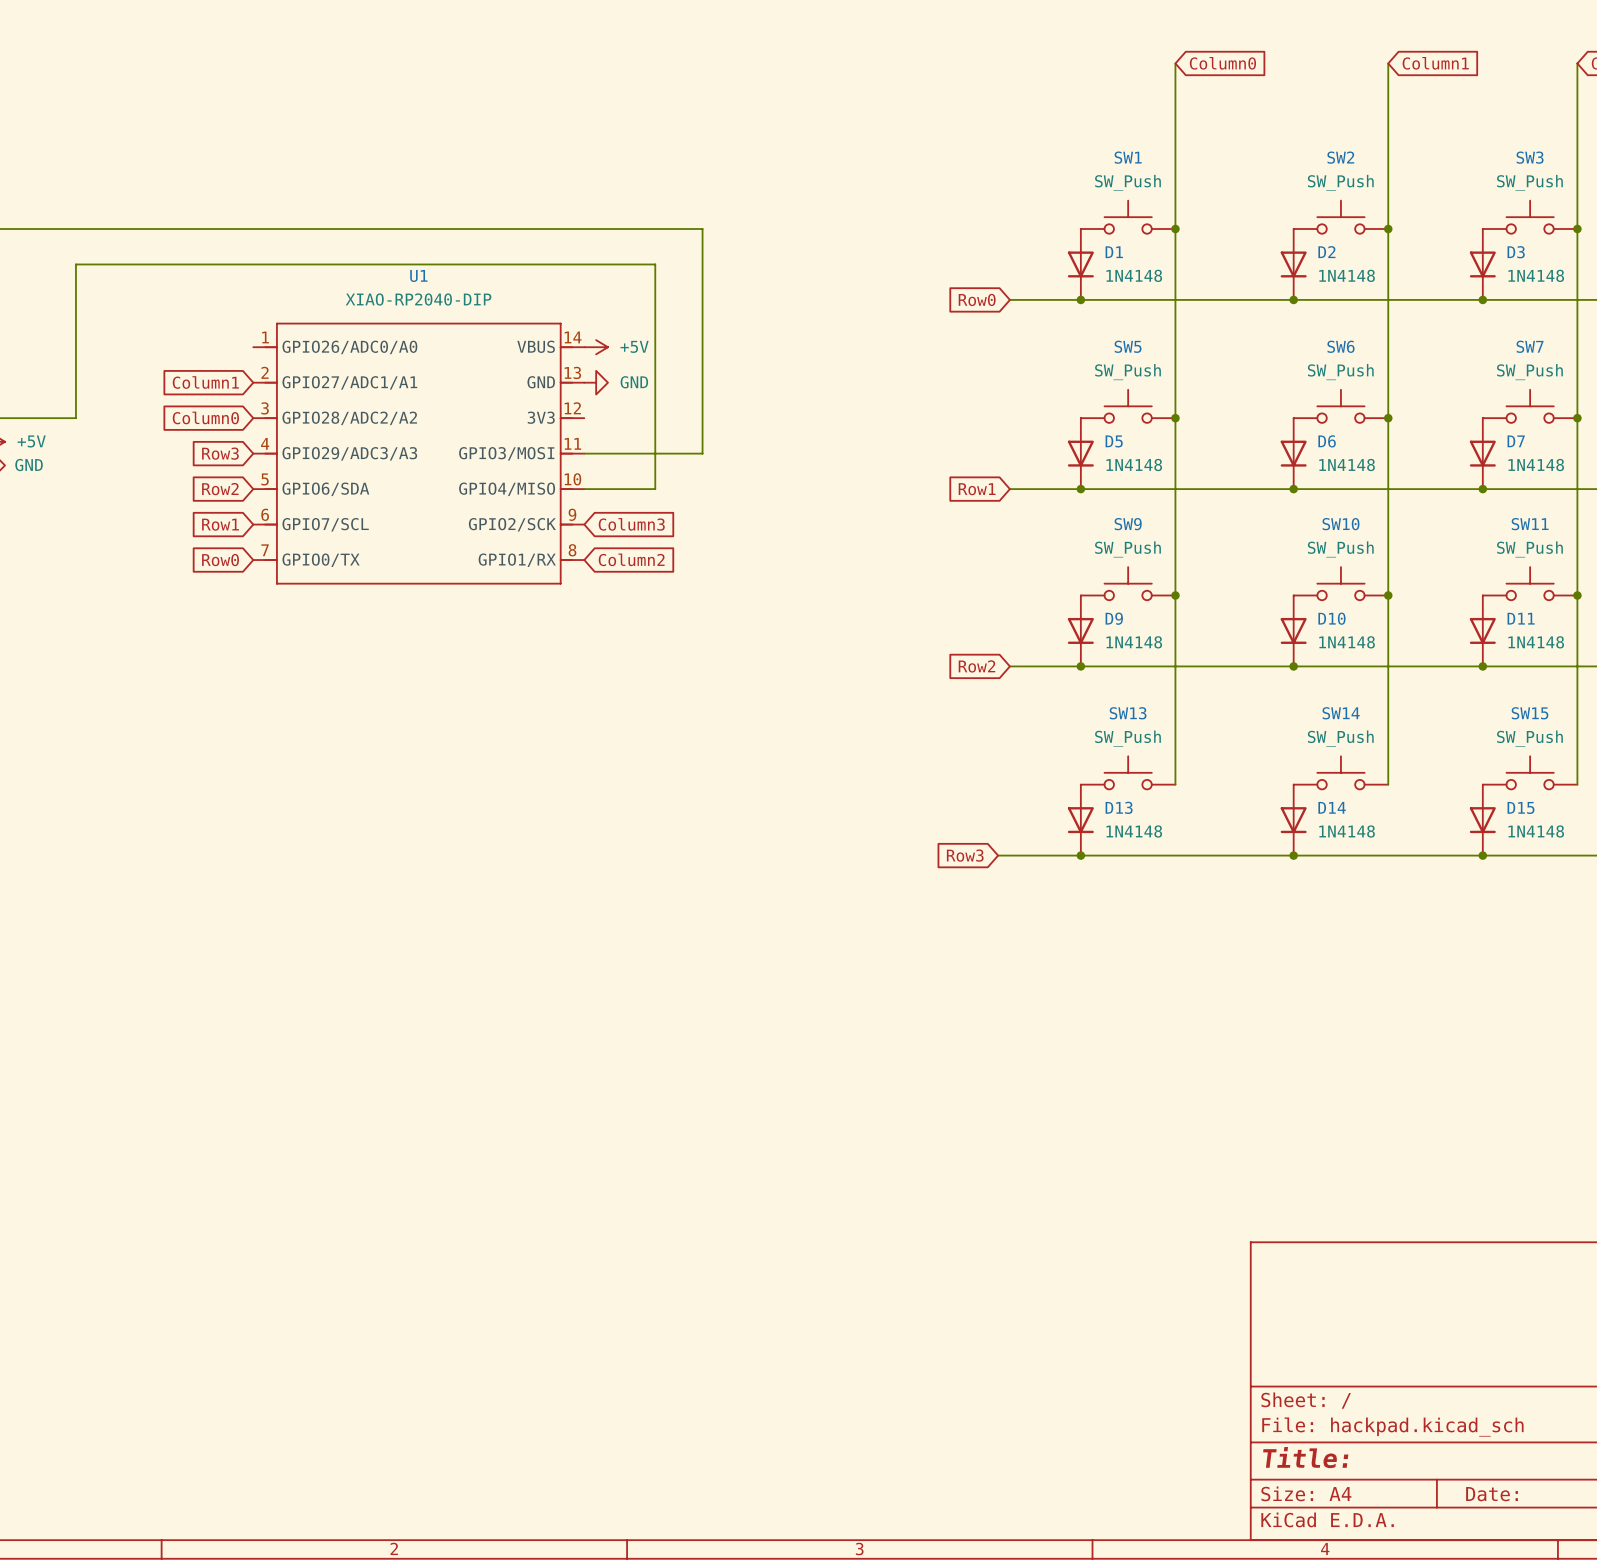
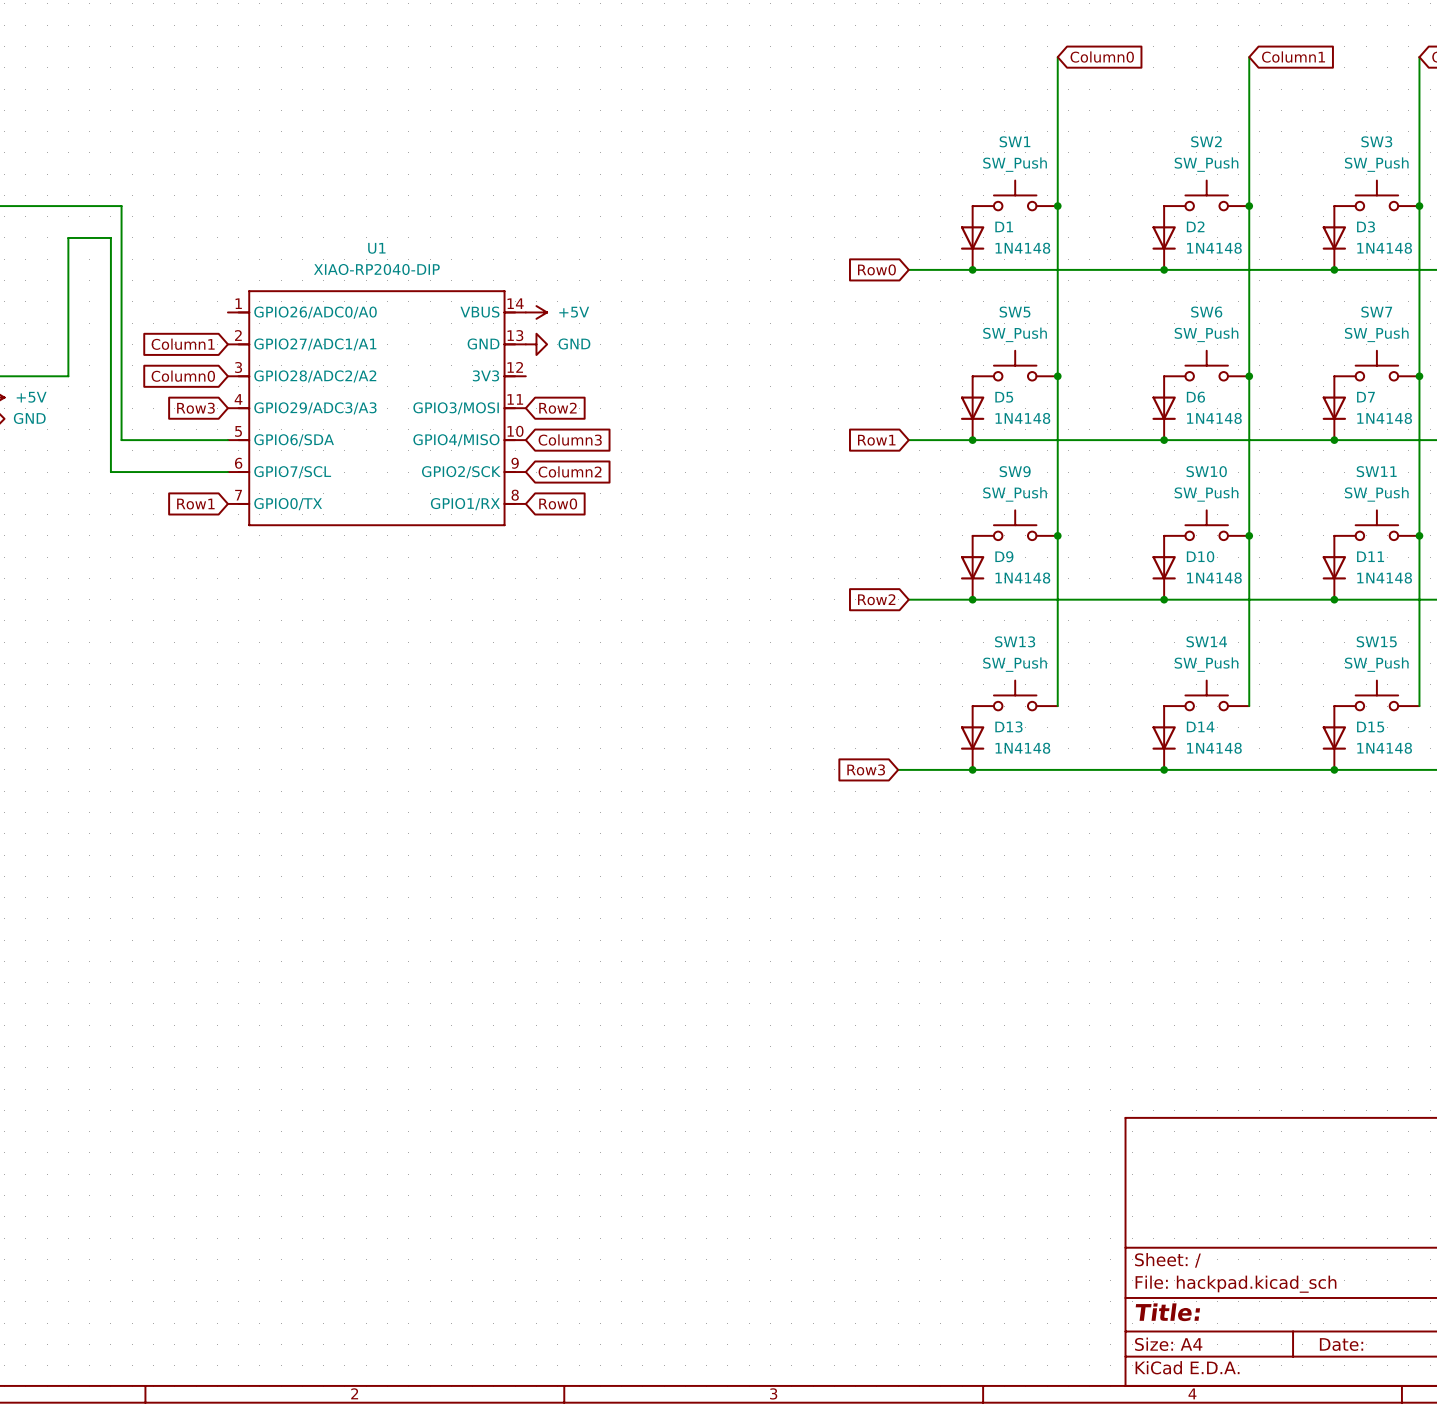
wire: (135, 229) (702, 229) (702, 453) (584, 453) -> (121, 206) (121, 440) (227, 440)
wire: (123, 264) (655, 264) (655, 489) (584, 489) -> (110, 237) (110, 472) (227, 472)
global label: none -> Row2 (557, 408)
global label: none -> Column3 (570, 439)
global label: Row2 (220, 489) -> none
global label: Row1 (220, 524) -> none
global label: Column3 (631, 524) -> Column2 (570, 471)
global label: Column2 (631, 559) -> Row0 (558, 503)
global label: Row0 (220, 560) -> Row1 (195, 504)

